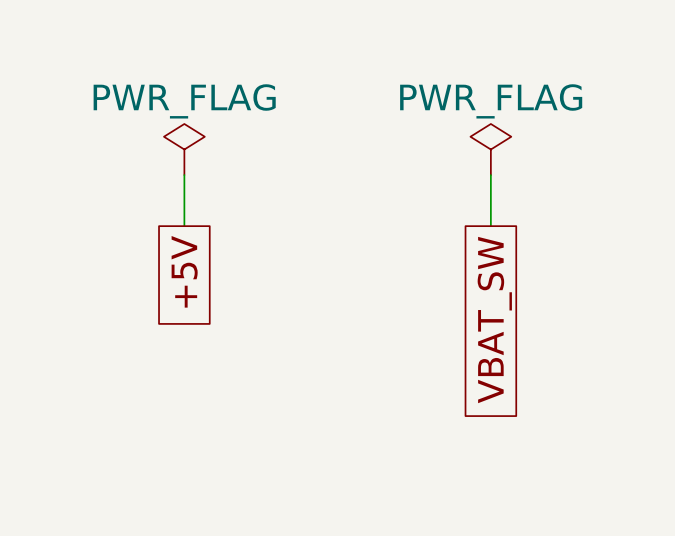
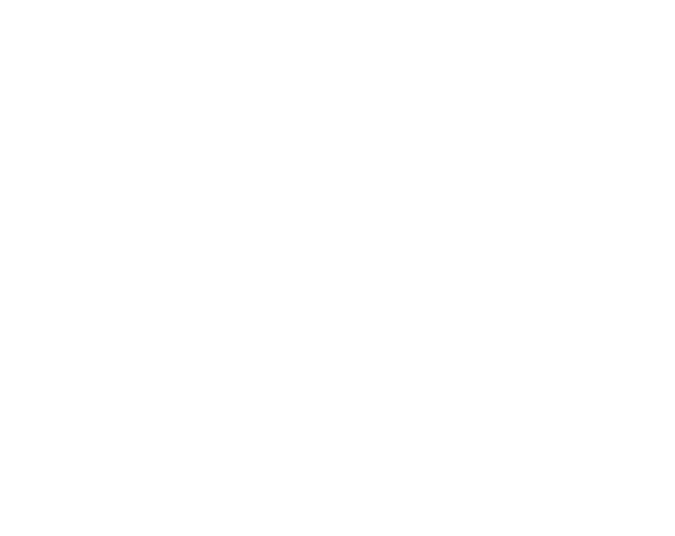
power symbol: PWR_FLAG (184, 149) -> none
power symbol: PWR_FLAG (490, 149) -> none
wire: (184, 175) (184, 226) -> none
wire: (490, 175) (490, 226) -> none
global label: +5V (184, 271) -> none
global label: VBAT_SW (494, 320) -> none

